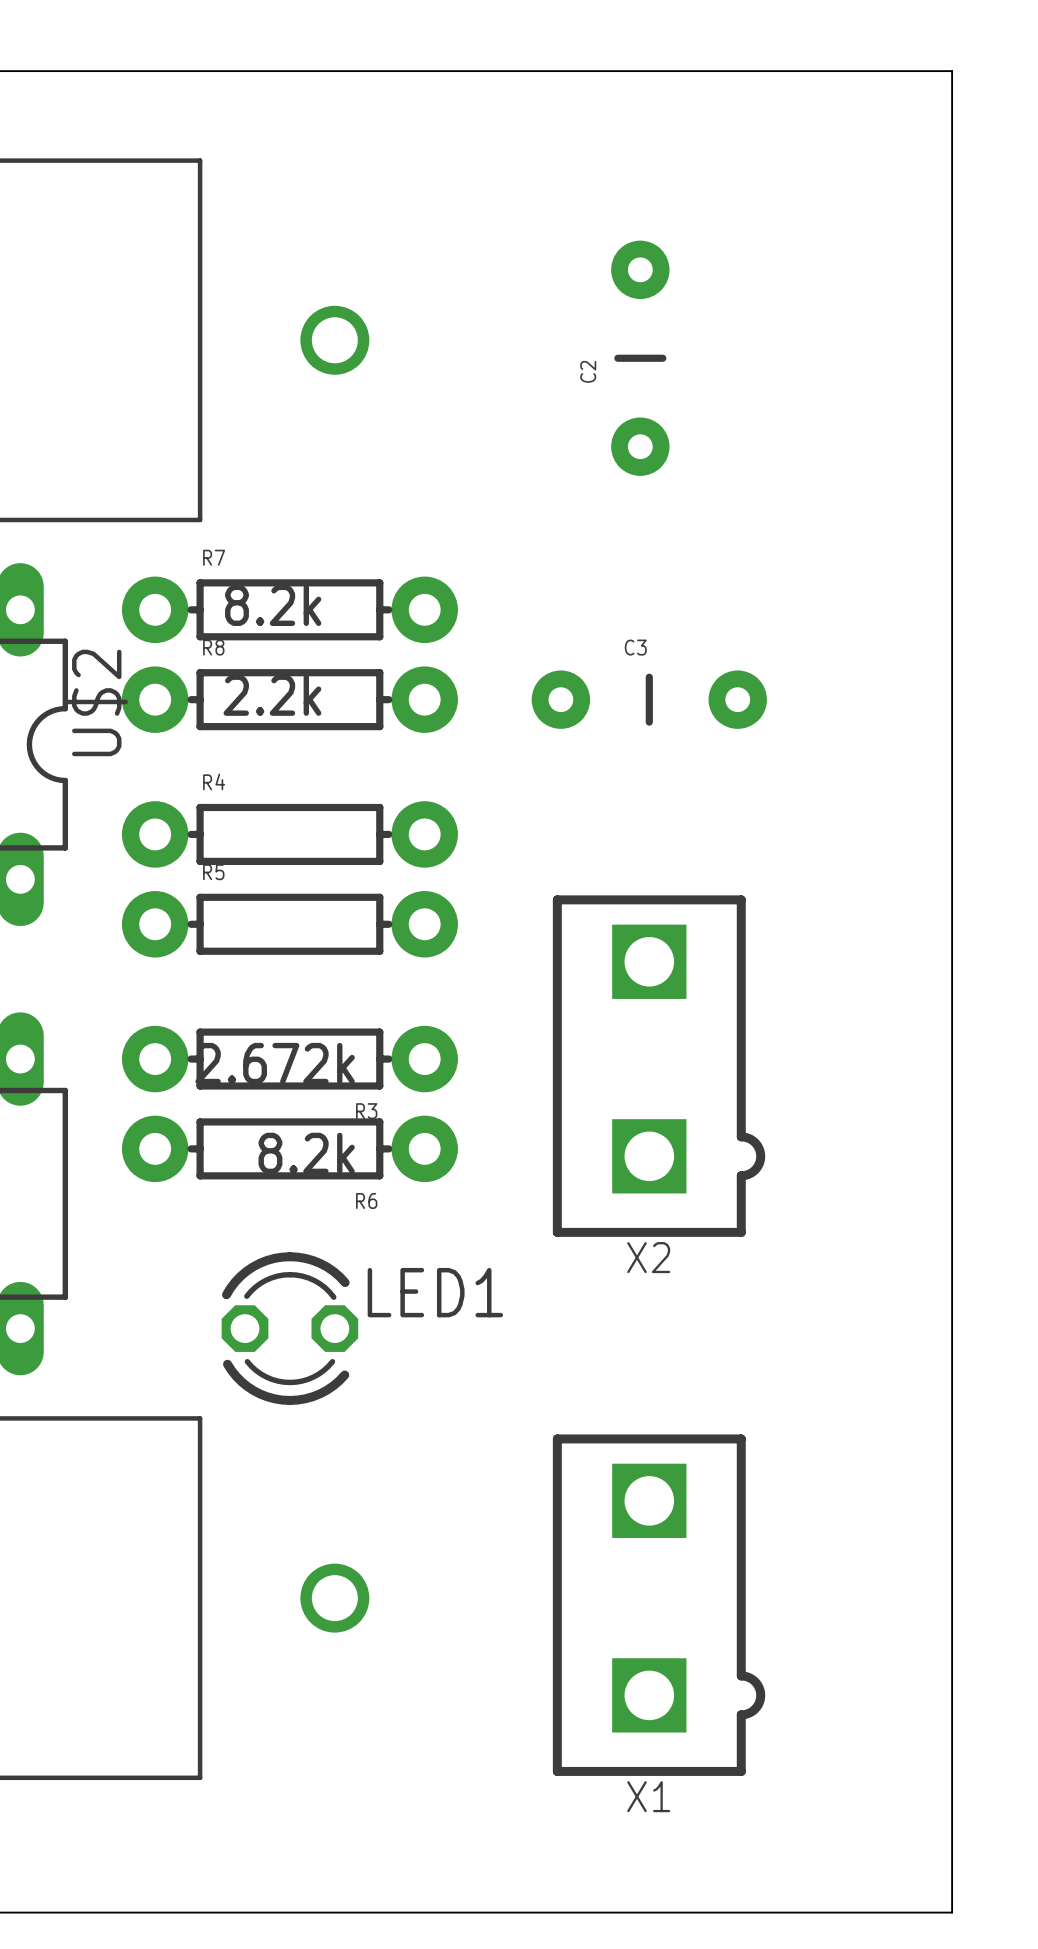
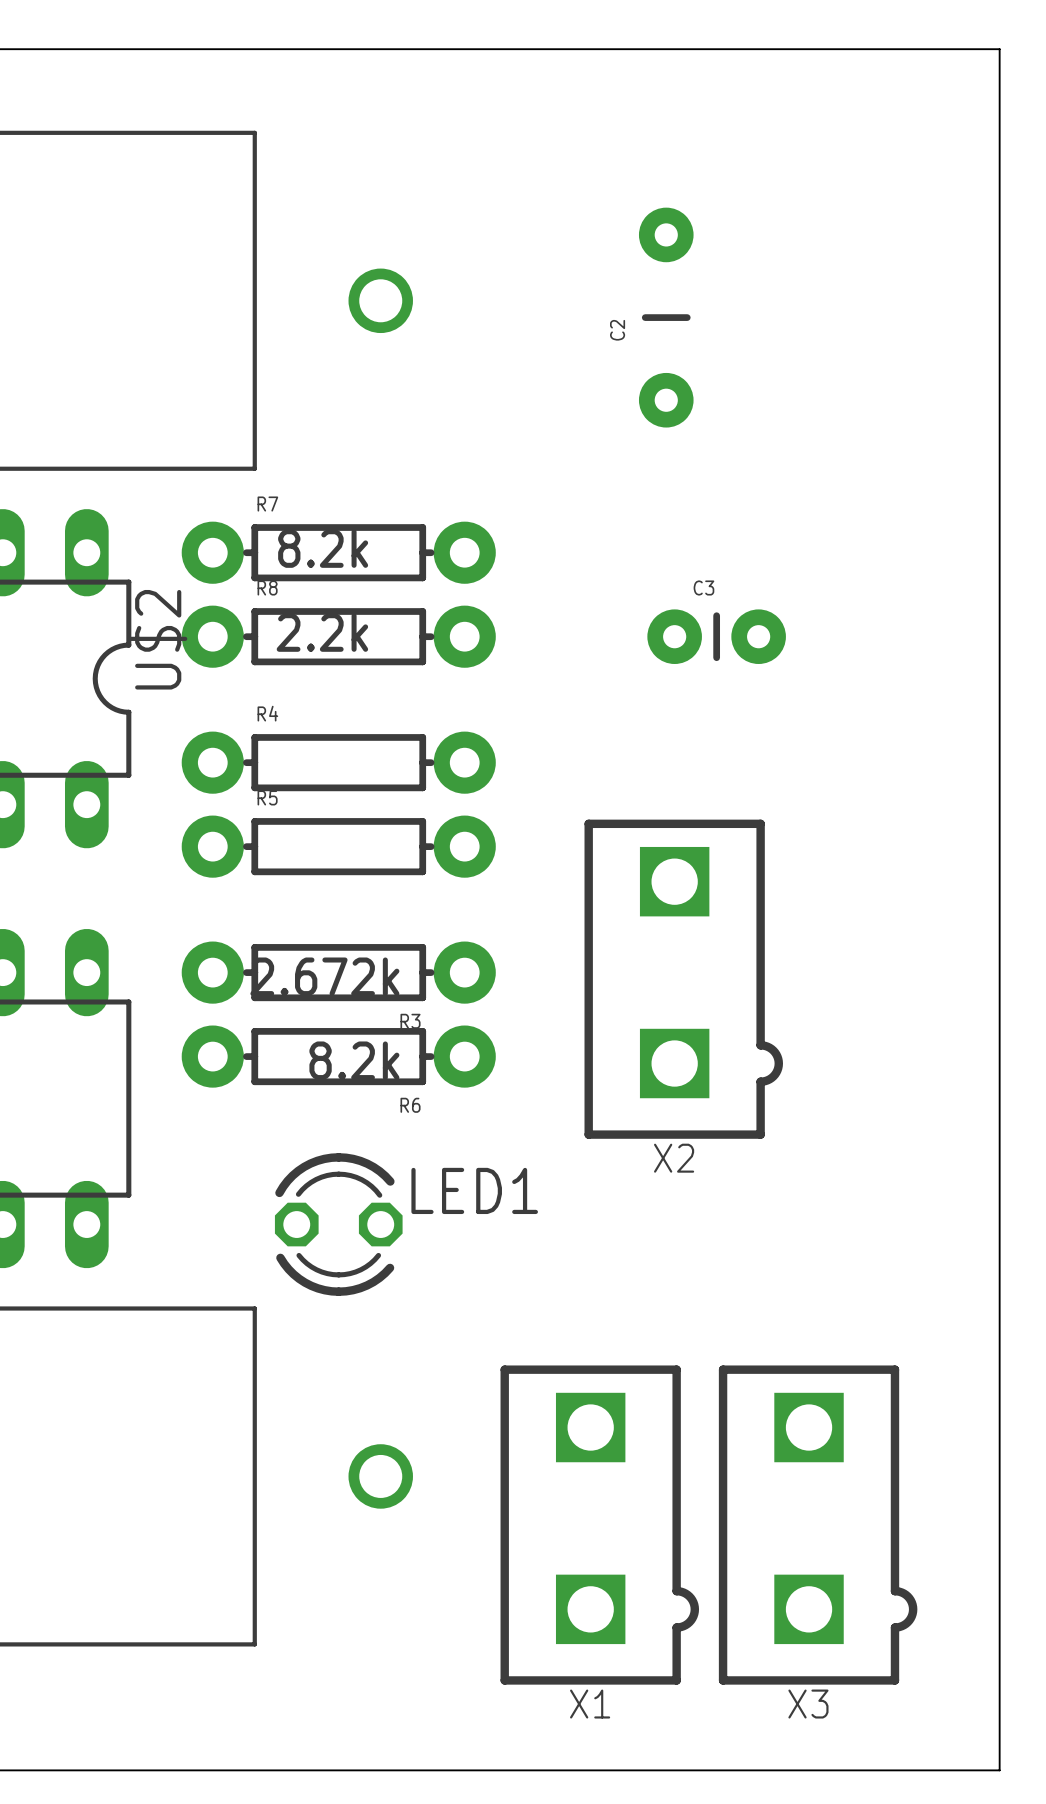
board edge: (952, 71) (952, 1912) -> (957, 49) (999, 49) (999, 1770) (957, 1770)
C3 footprint: [531, 670, 767, 729] -> [647, 609, 786, 664]
X1 position: (659, 1605) -> (599, 1525)
X3: none -> (818, 1525)

